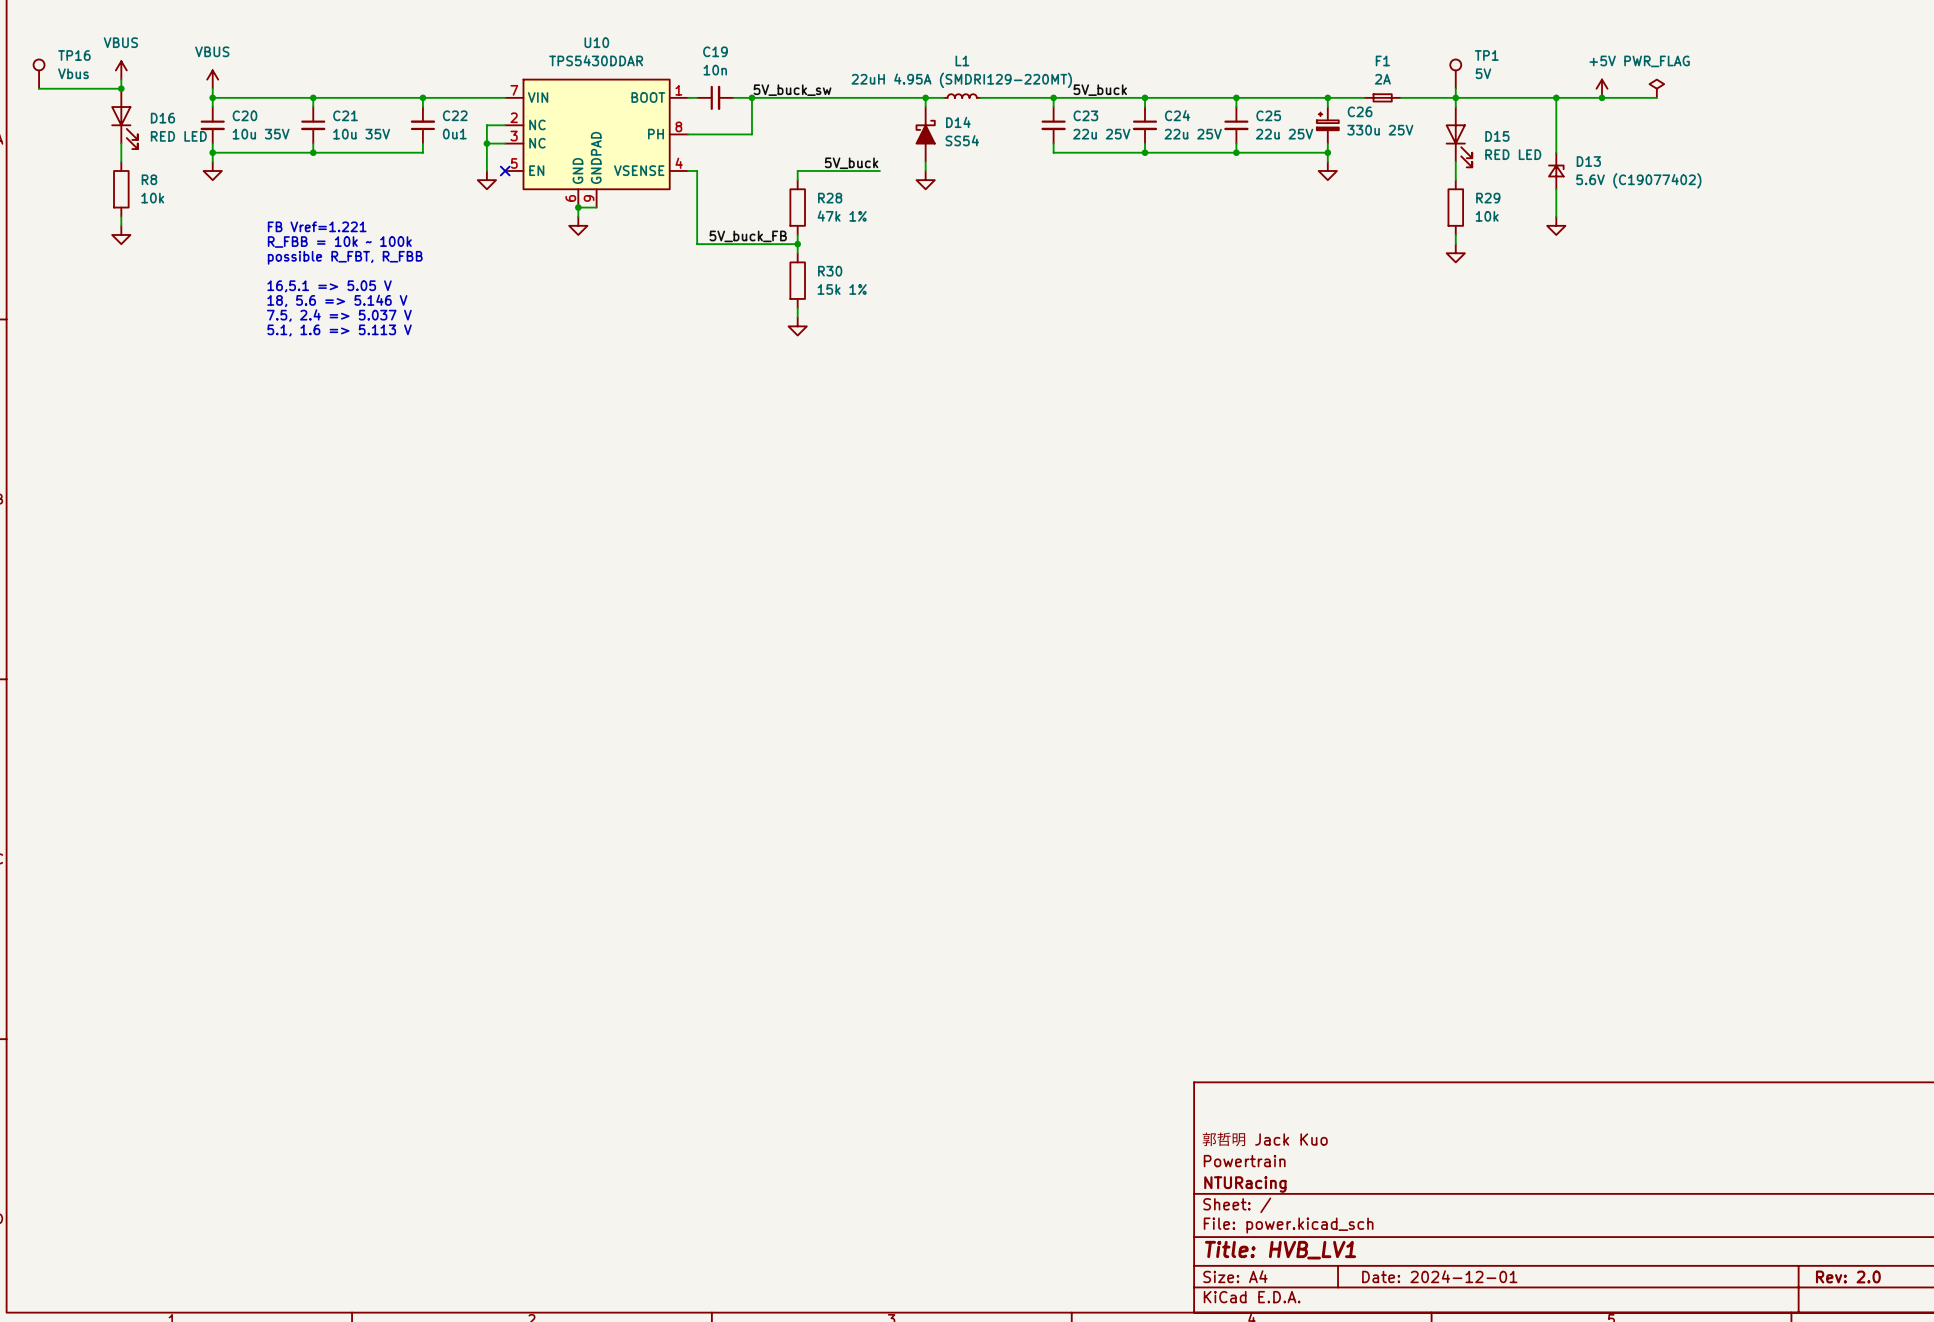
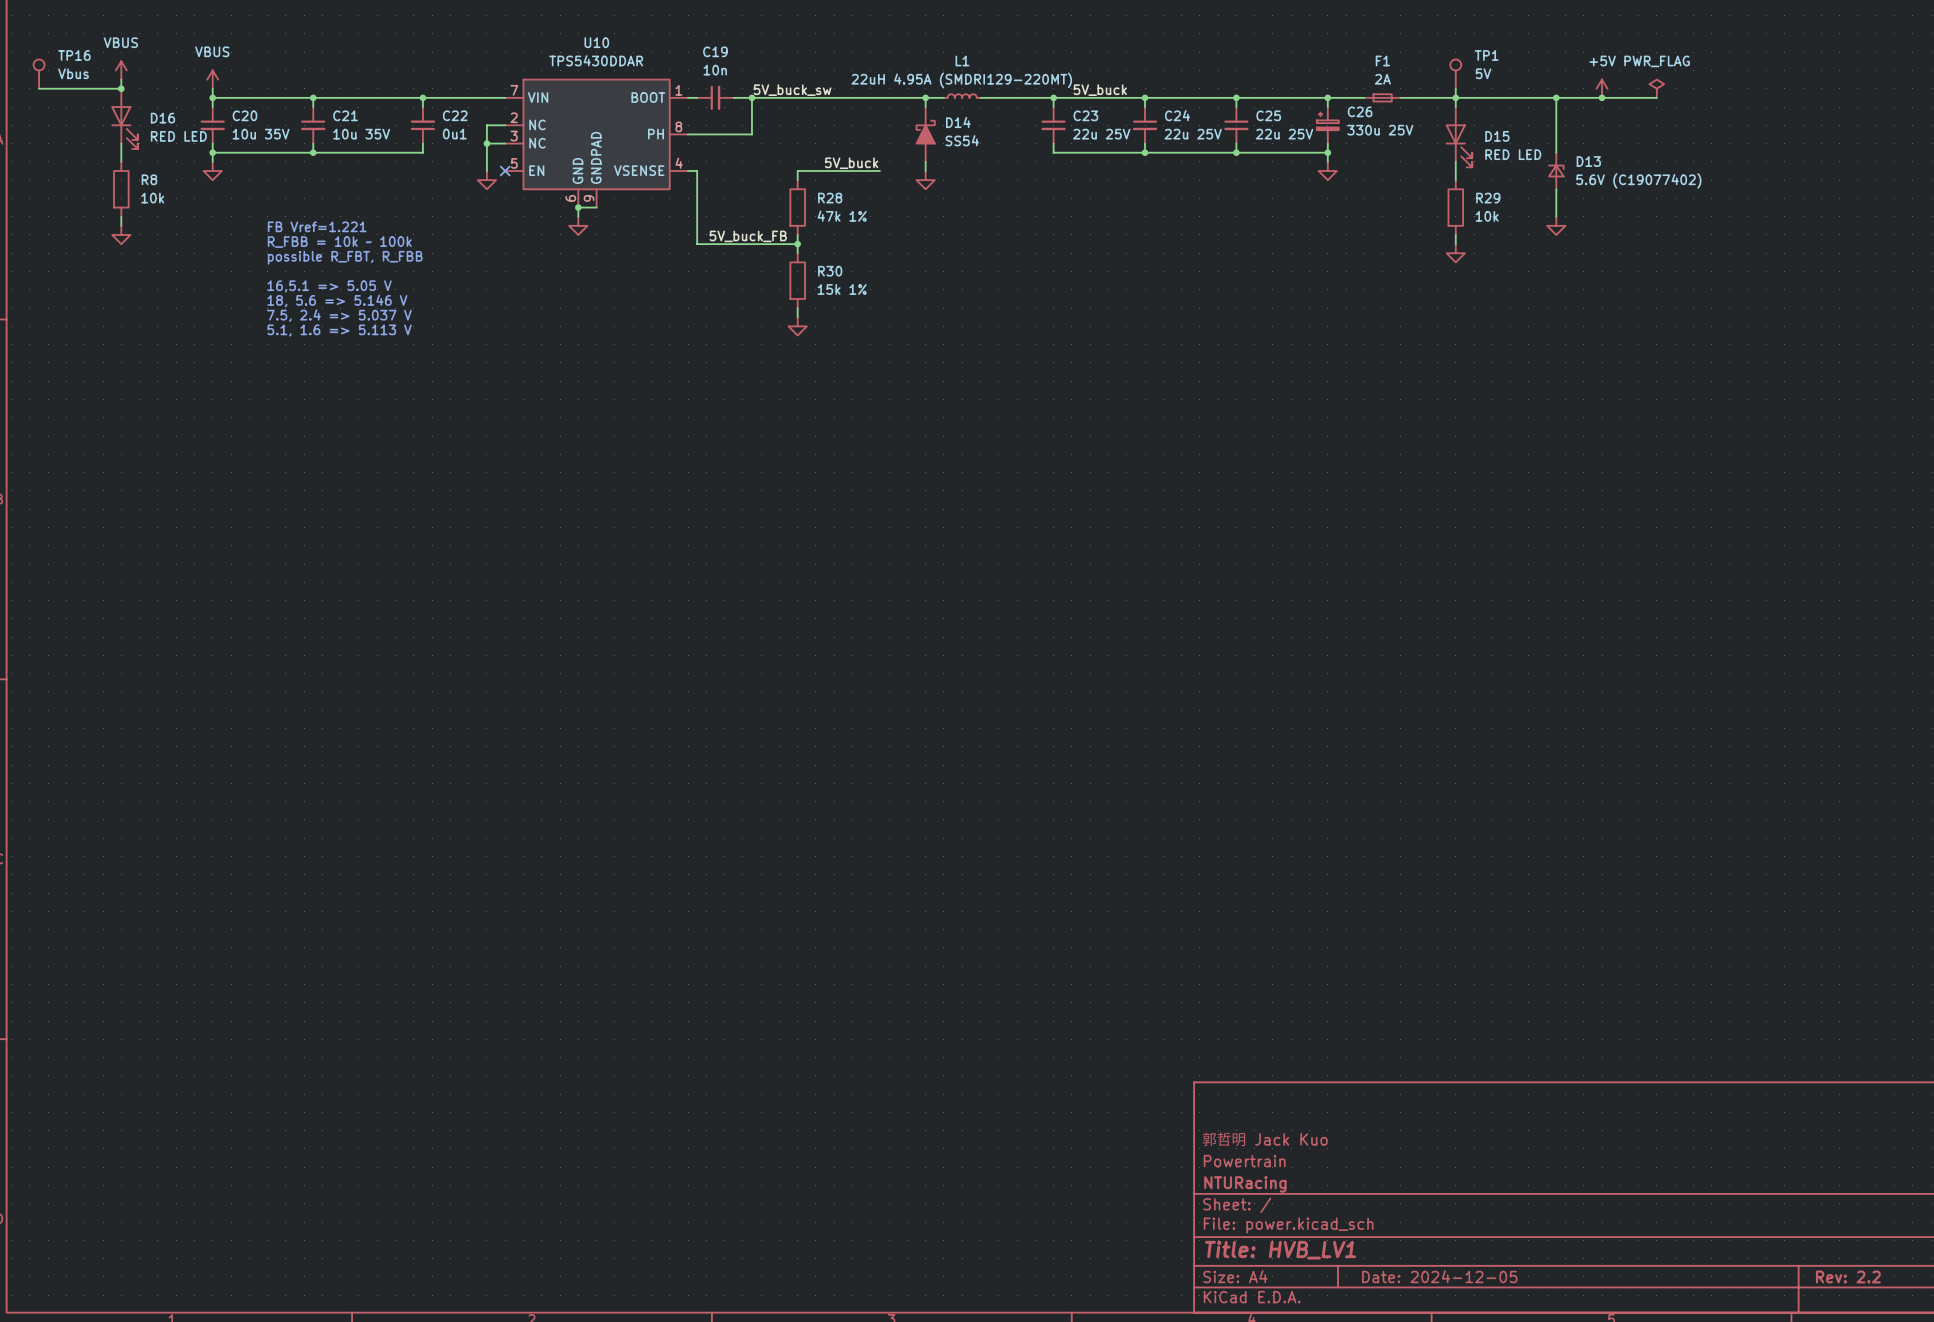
title block: Date: 2024-12-01 (1439, 1276) -> Date: 2024-12-05 (1439, 1276)
title block: Rev: 2.0 (1848, 1276) -> Rev: 2.2 (1848, 1276)

